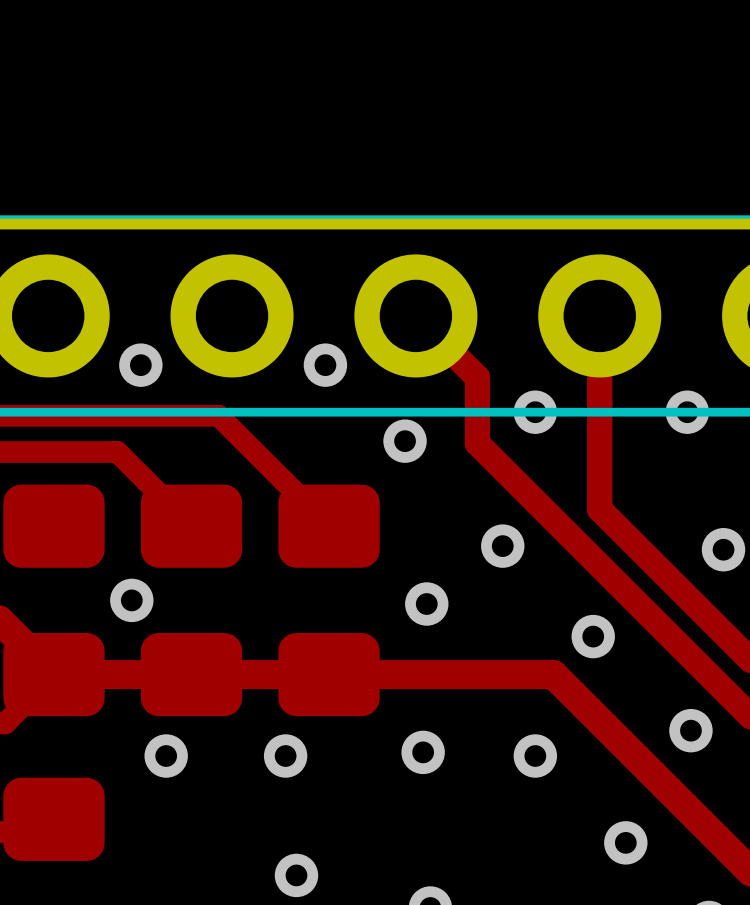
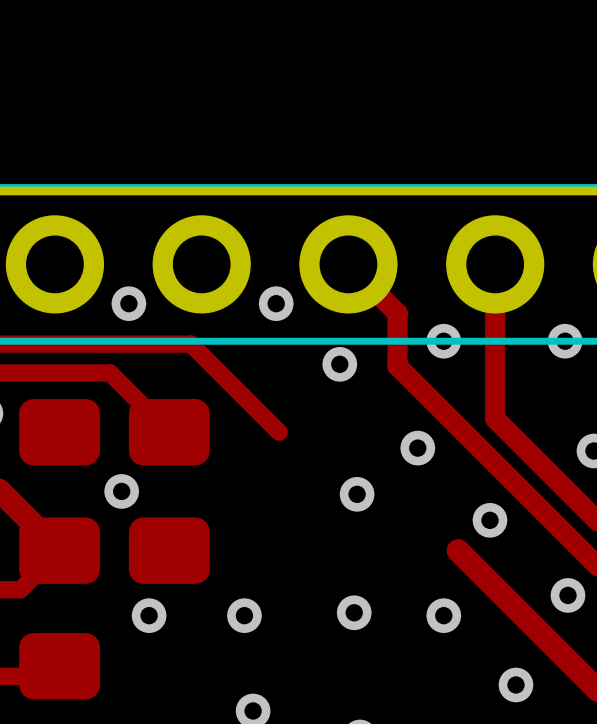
part: (329, 600) -> none
top track: (553, 674) (54, 674) -> none

